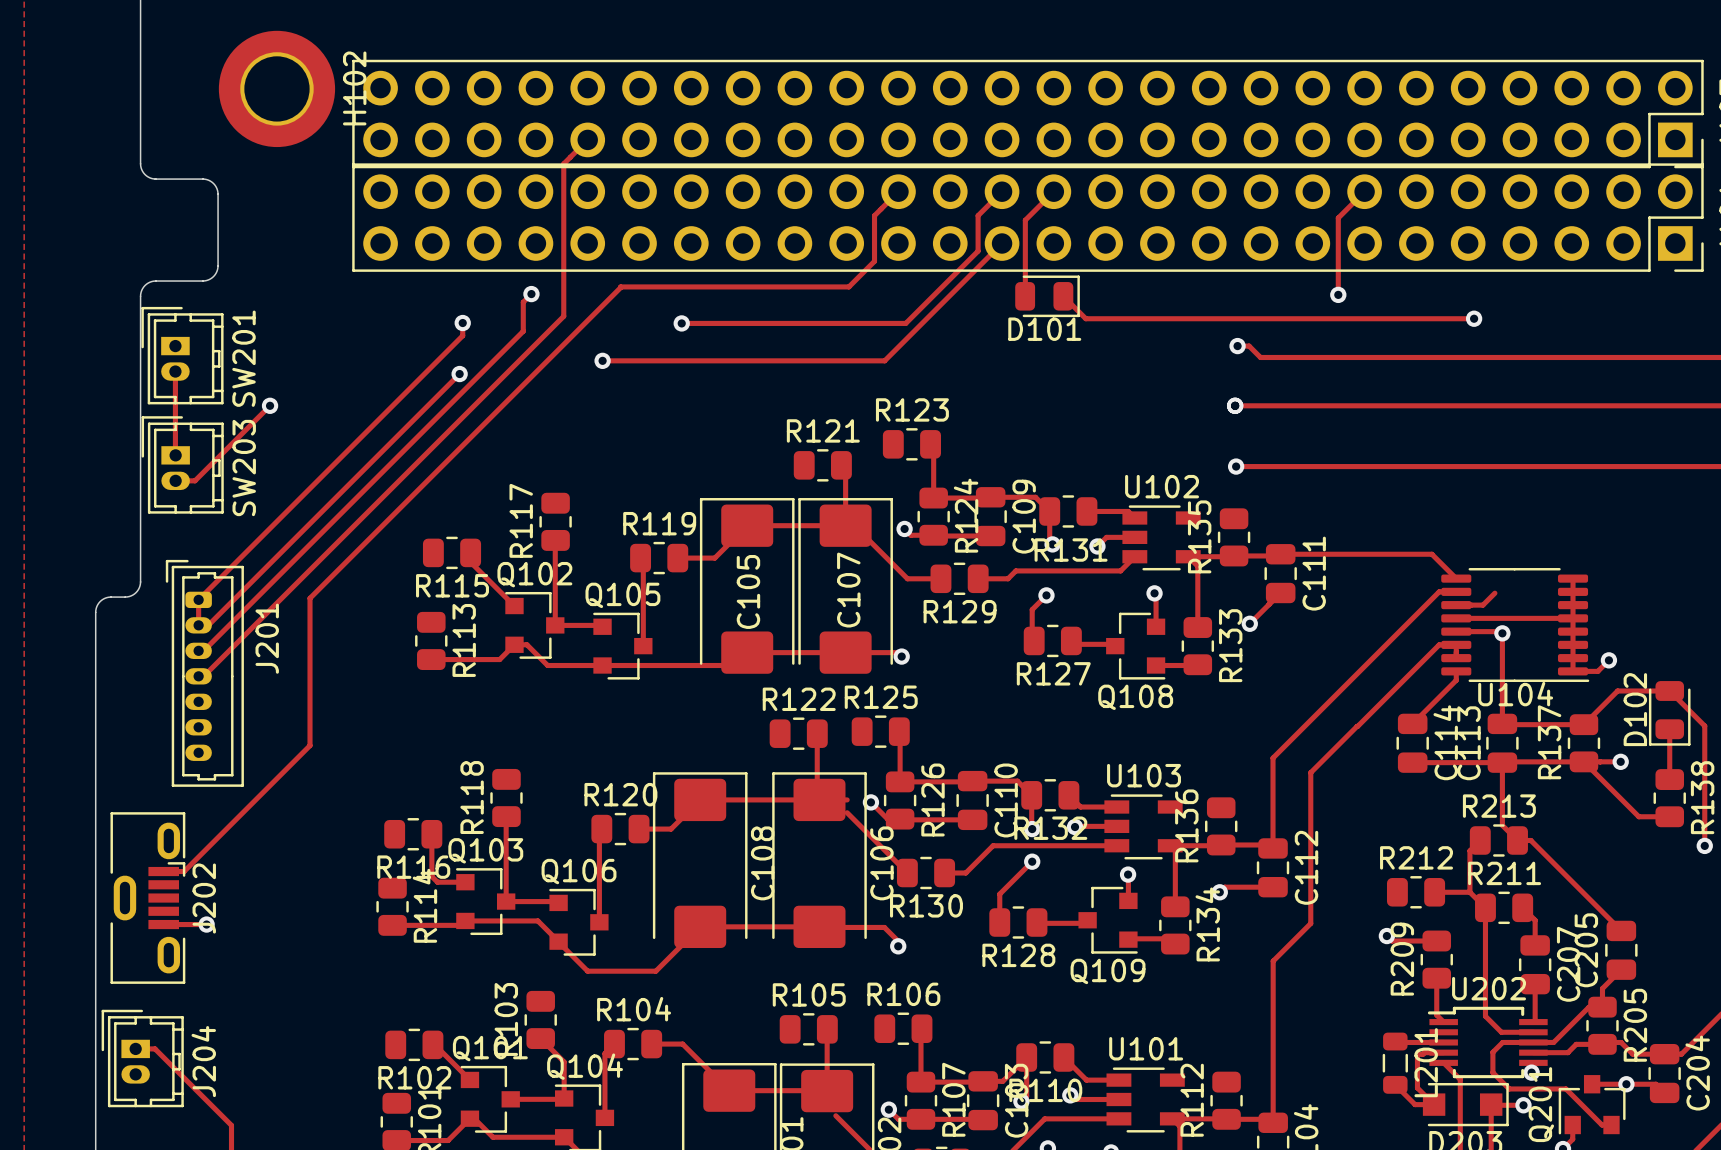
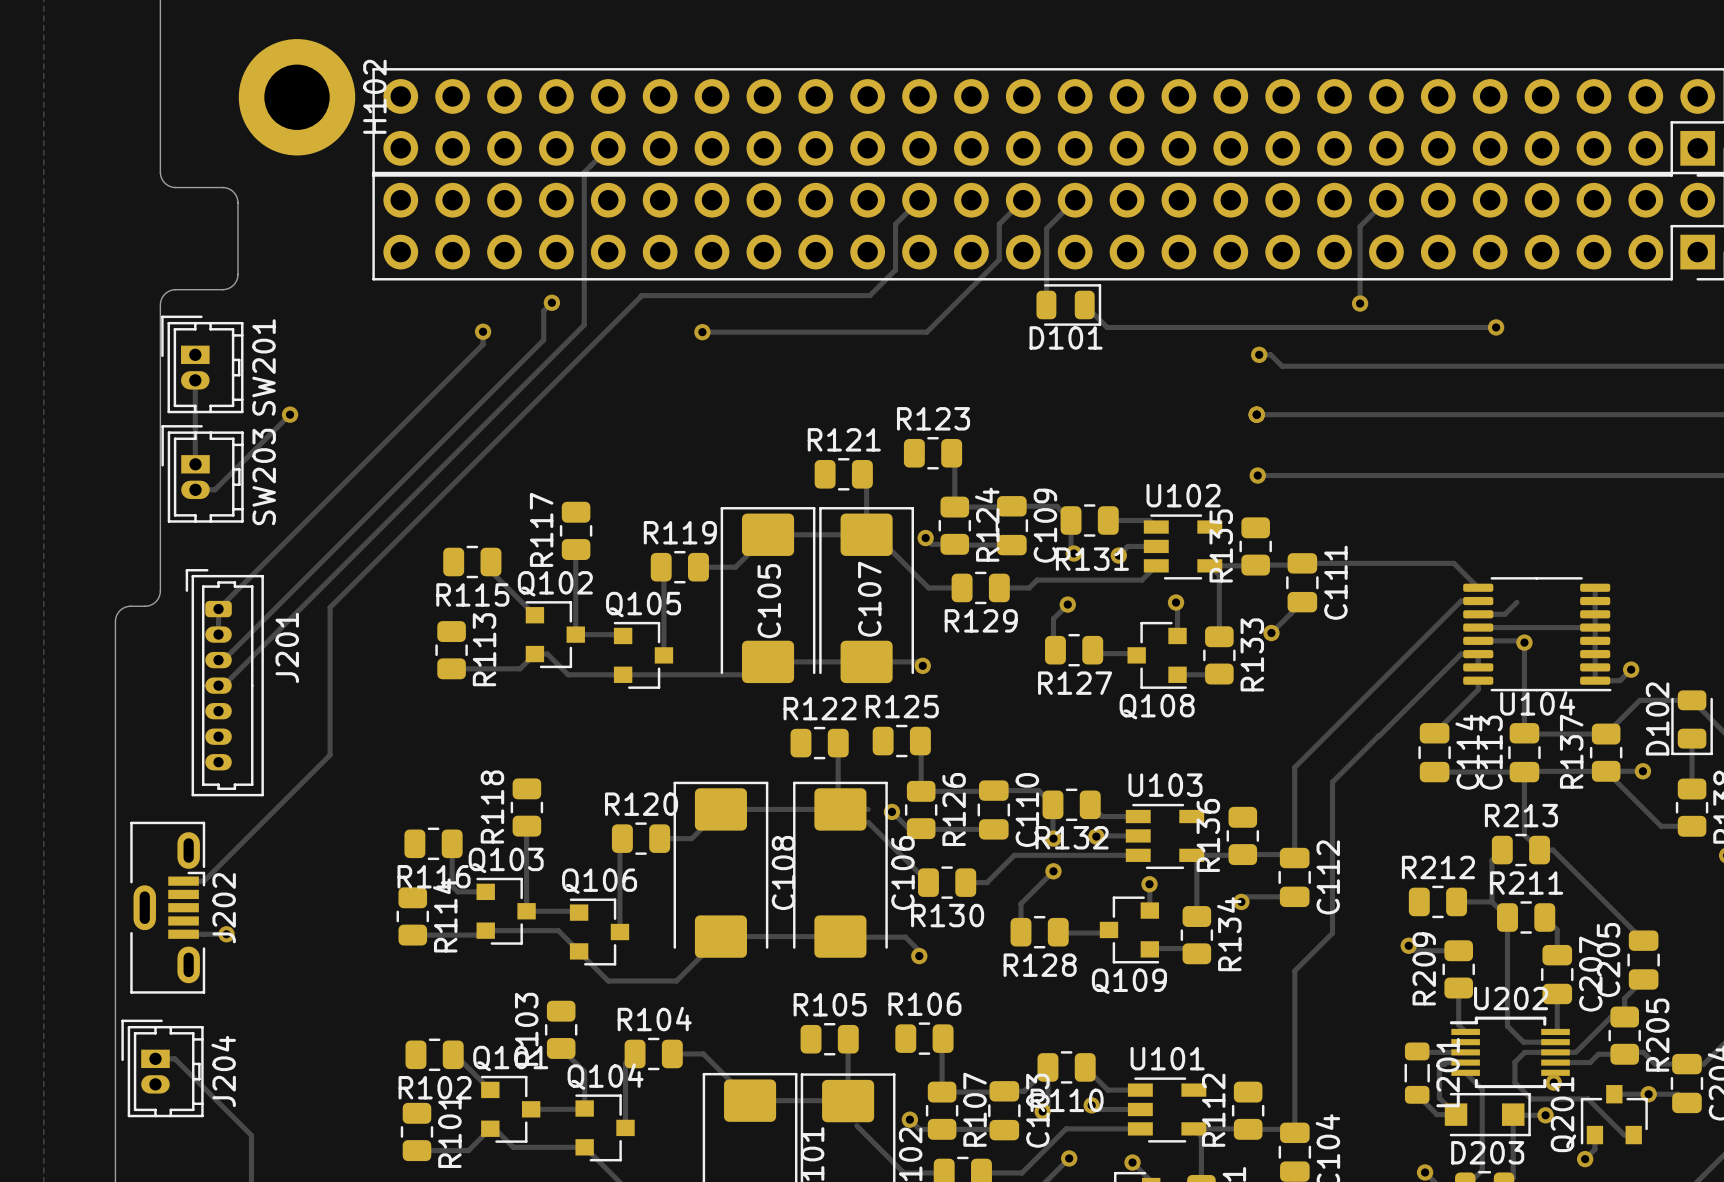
track: (1002, 243) (884, 360) (602, 360) -> none
via: (602, 360) -> none
track: (459, 374) (208, 625) (198, 625) -> none
via: (459, 374) -> none

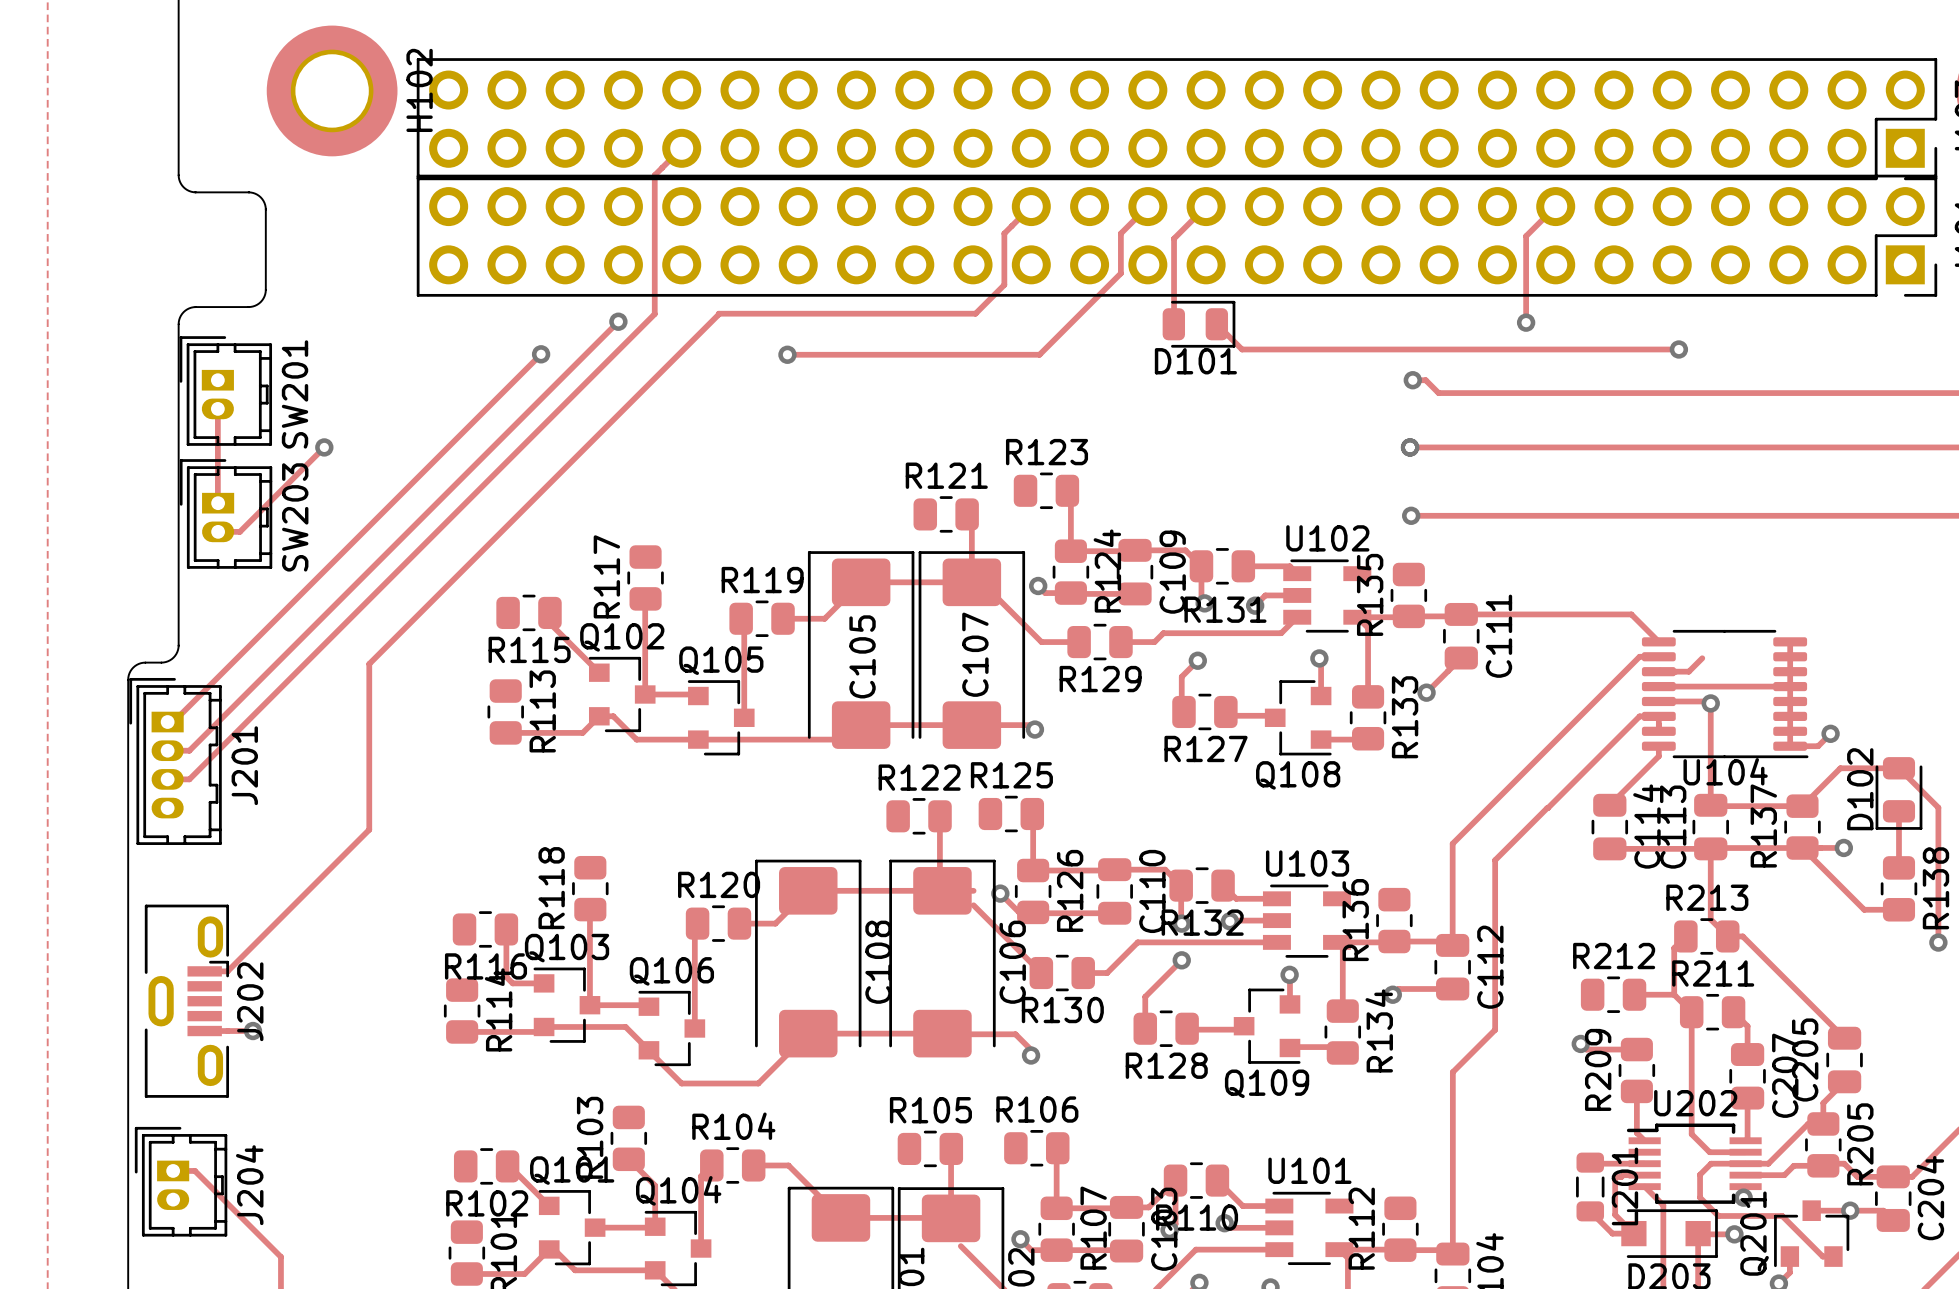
track: (584, 295) (584, 325) (223, 685) (218, 685) -> (654, 314) (189, 779) (167, 779)
track: (543, 310) (543, 340) (223, 660) (218, 660) -> (609, 330) (189, 750) (167, 750)
track: (483, 331) (483, 344) (218, 609) (218, 634) -> (541, 354) (173, 722) (167, 722)
J201 footprint: [185, 569, 264, 797] -> [129, 677, 222, 845]

